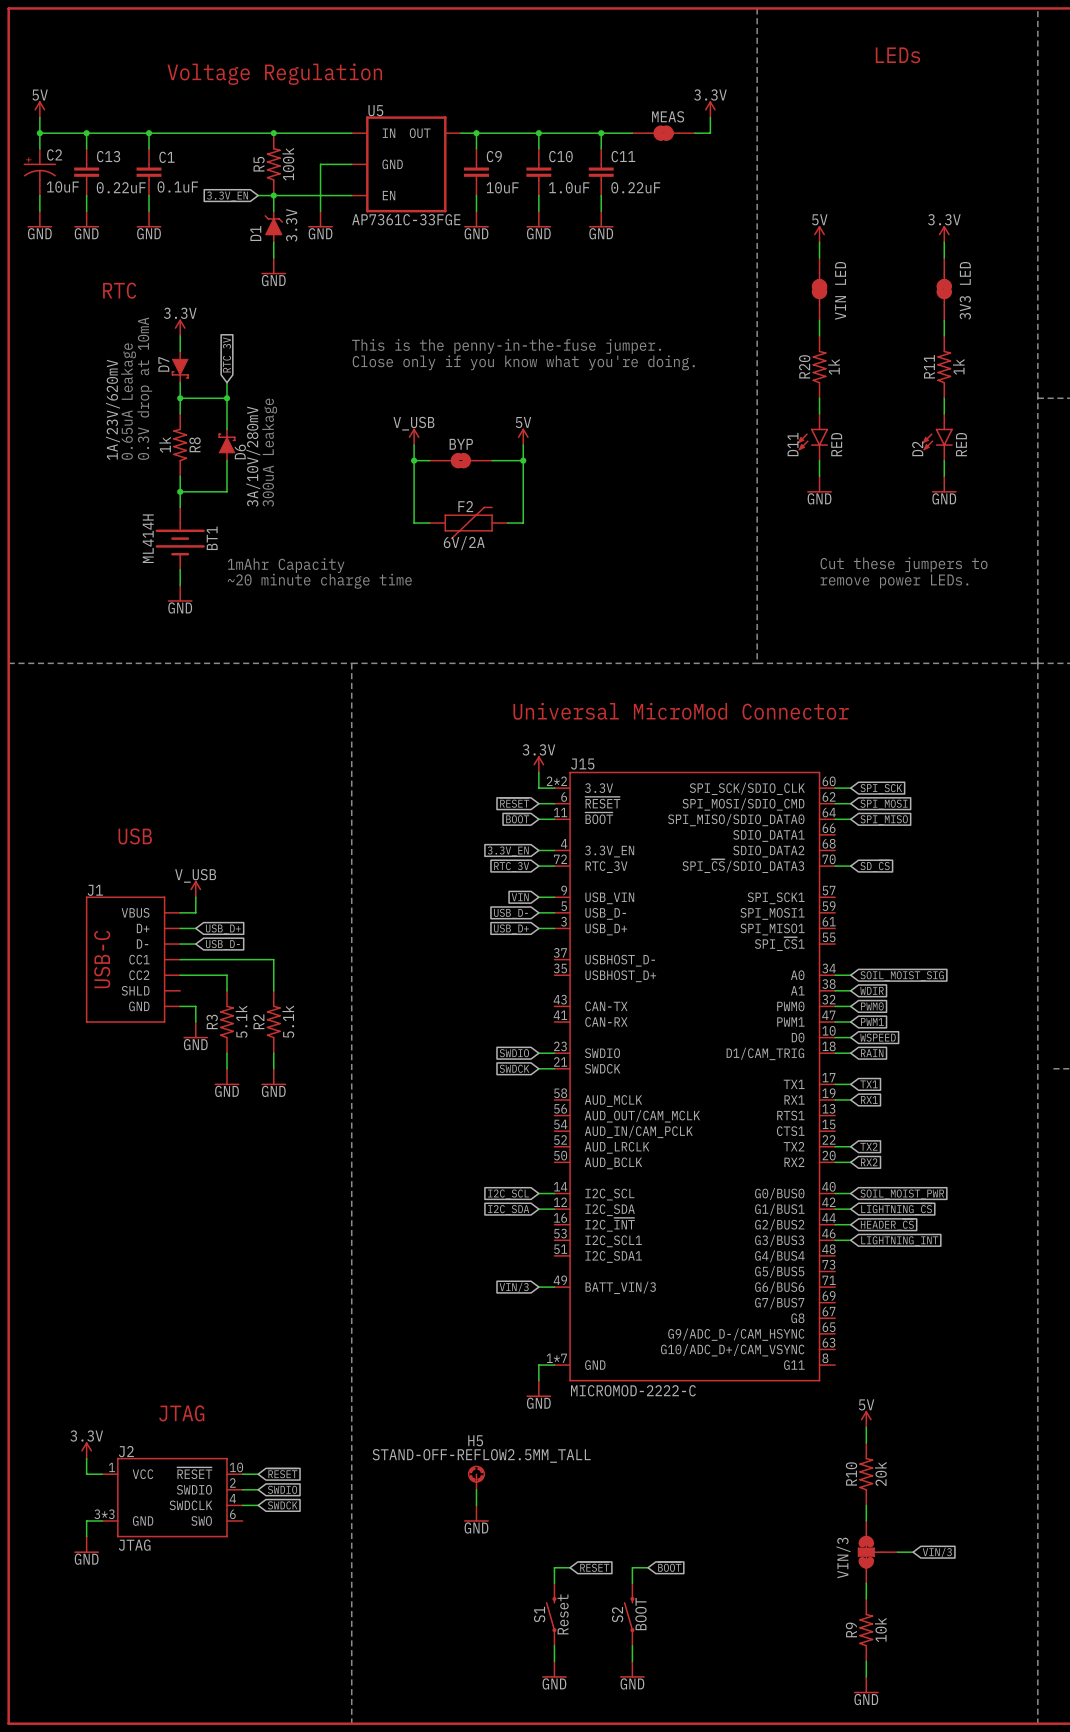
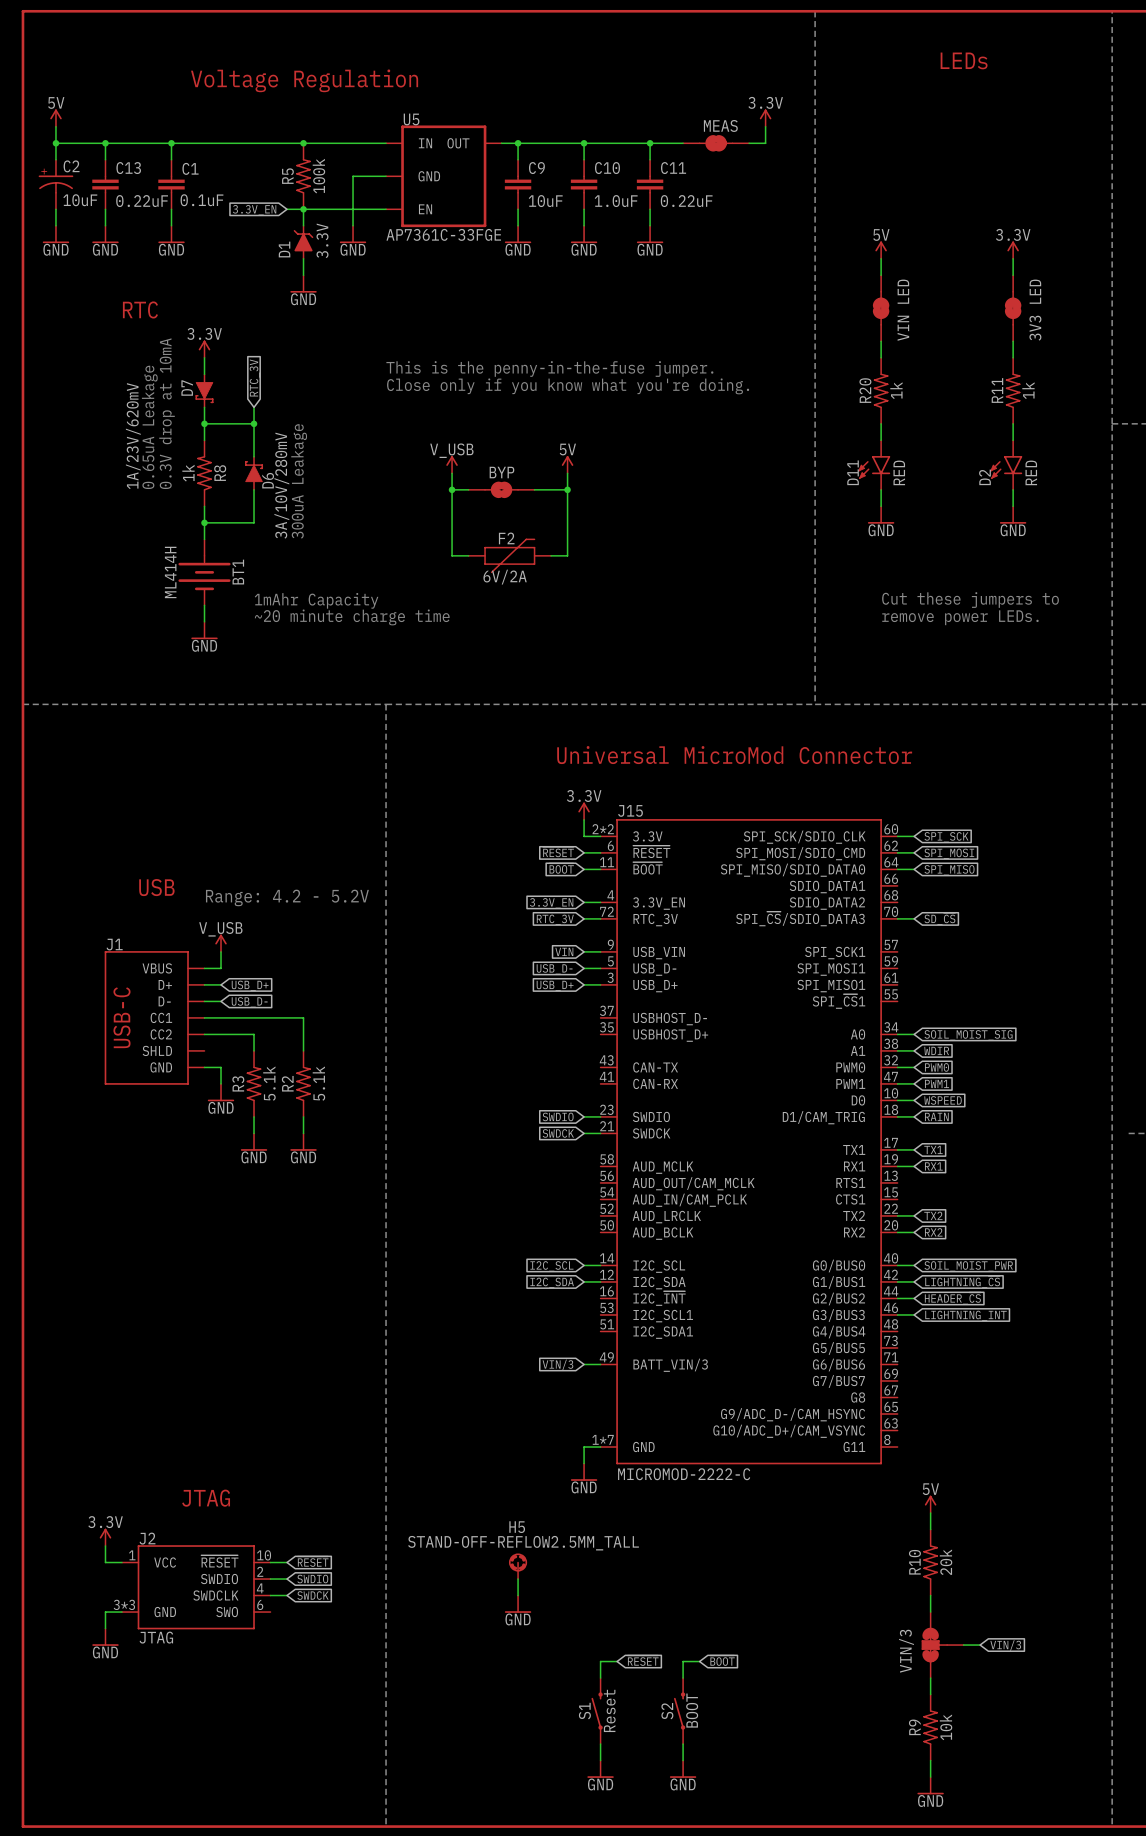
text: none -> Range: 4.2 - 5.2V (287, 897)

